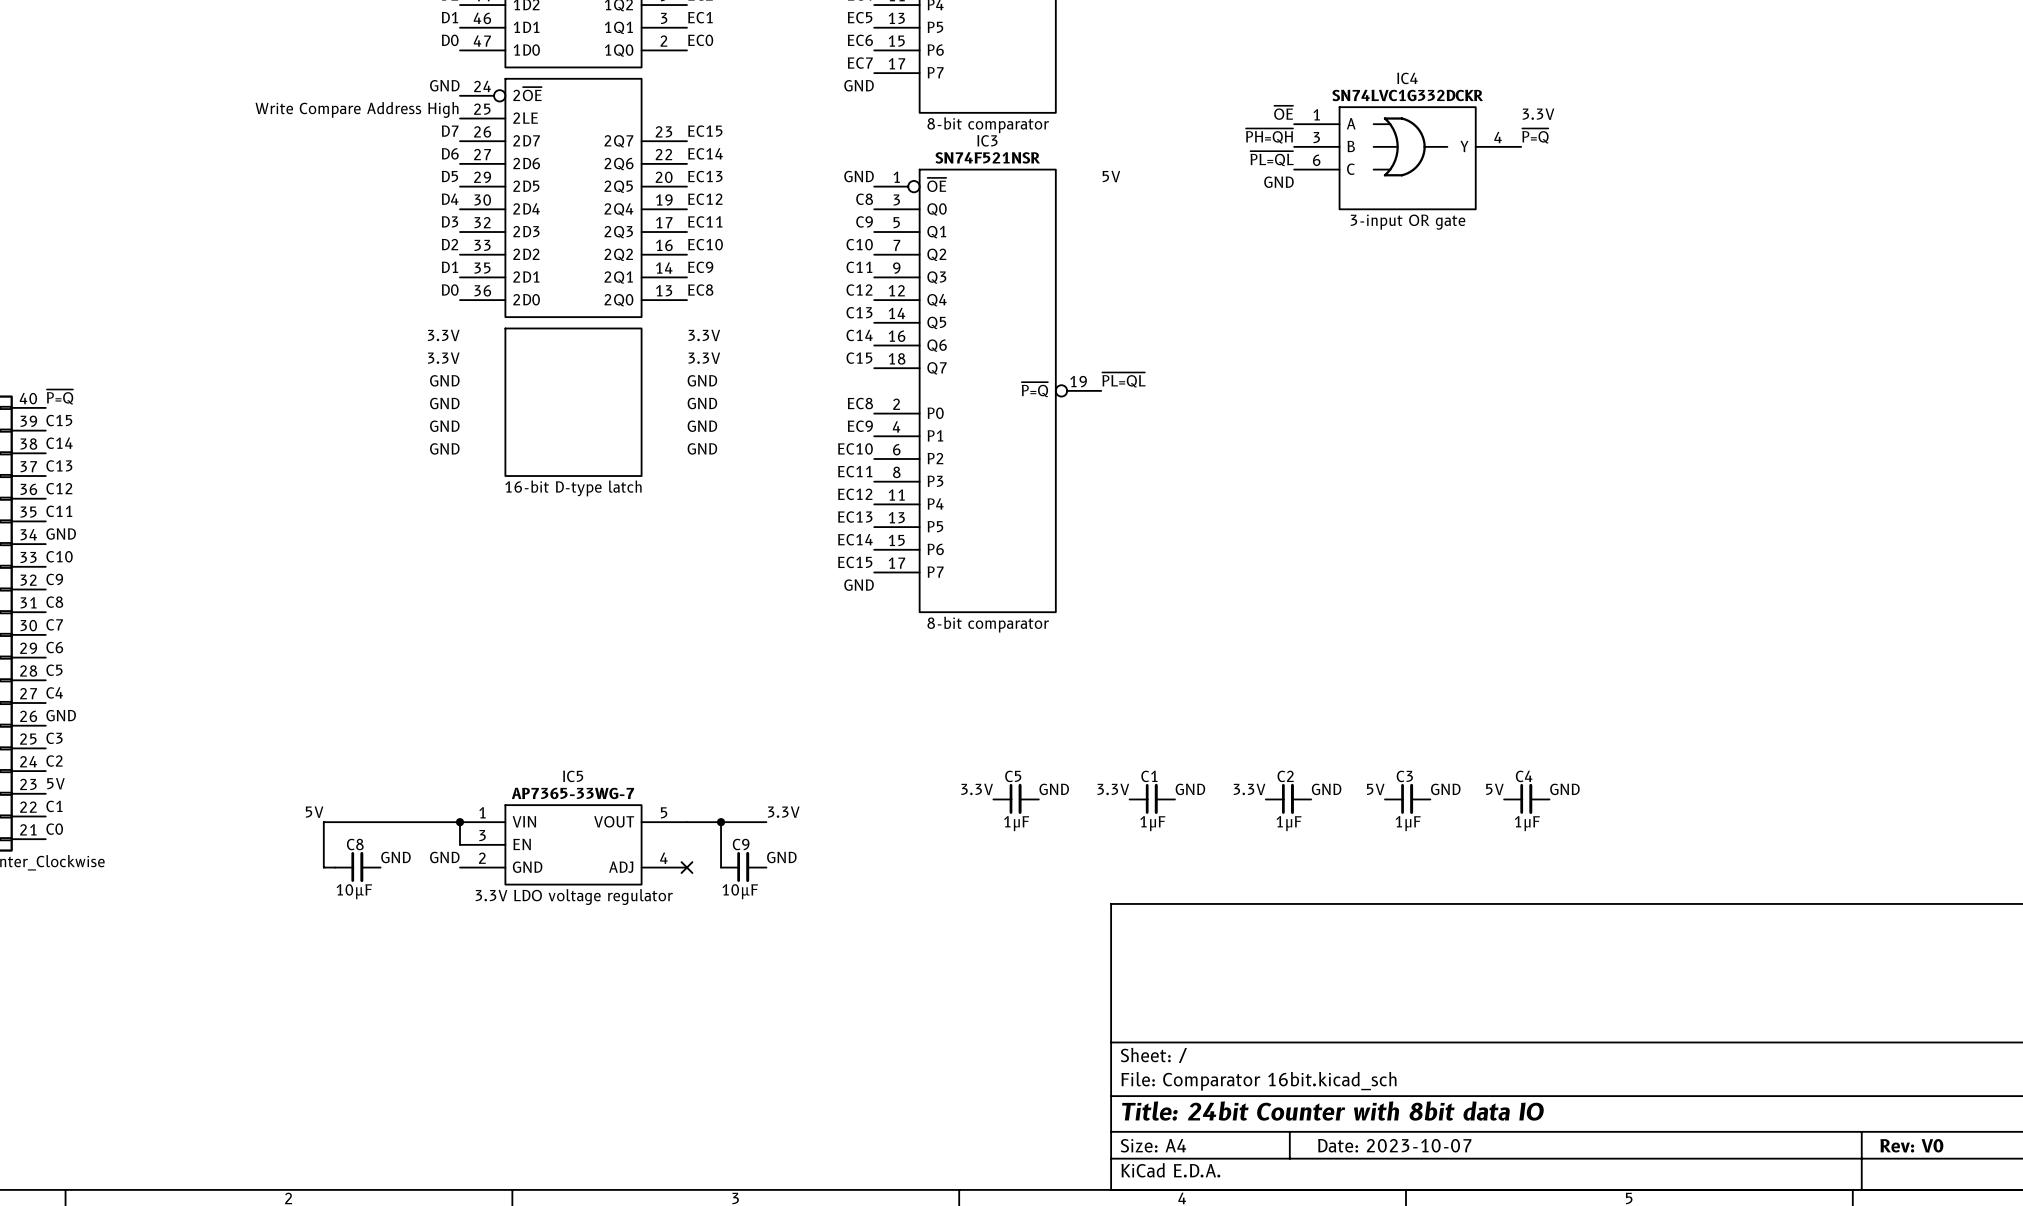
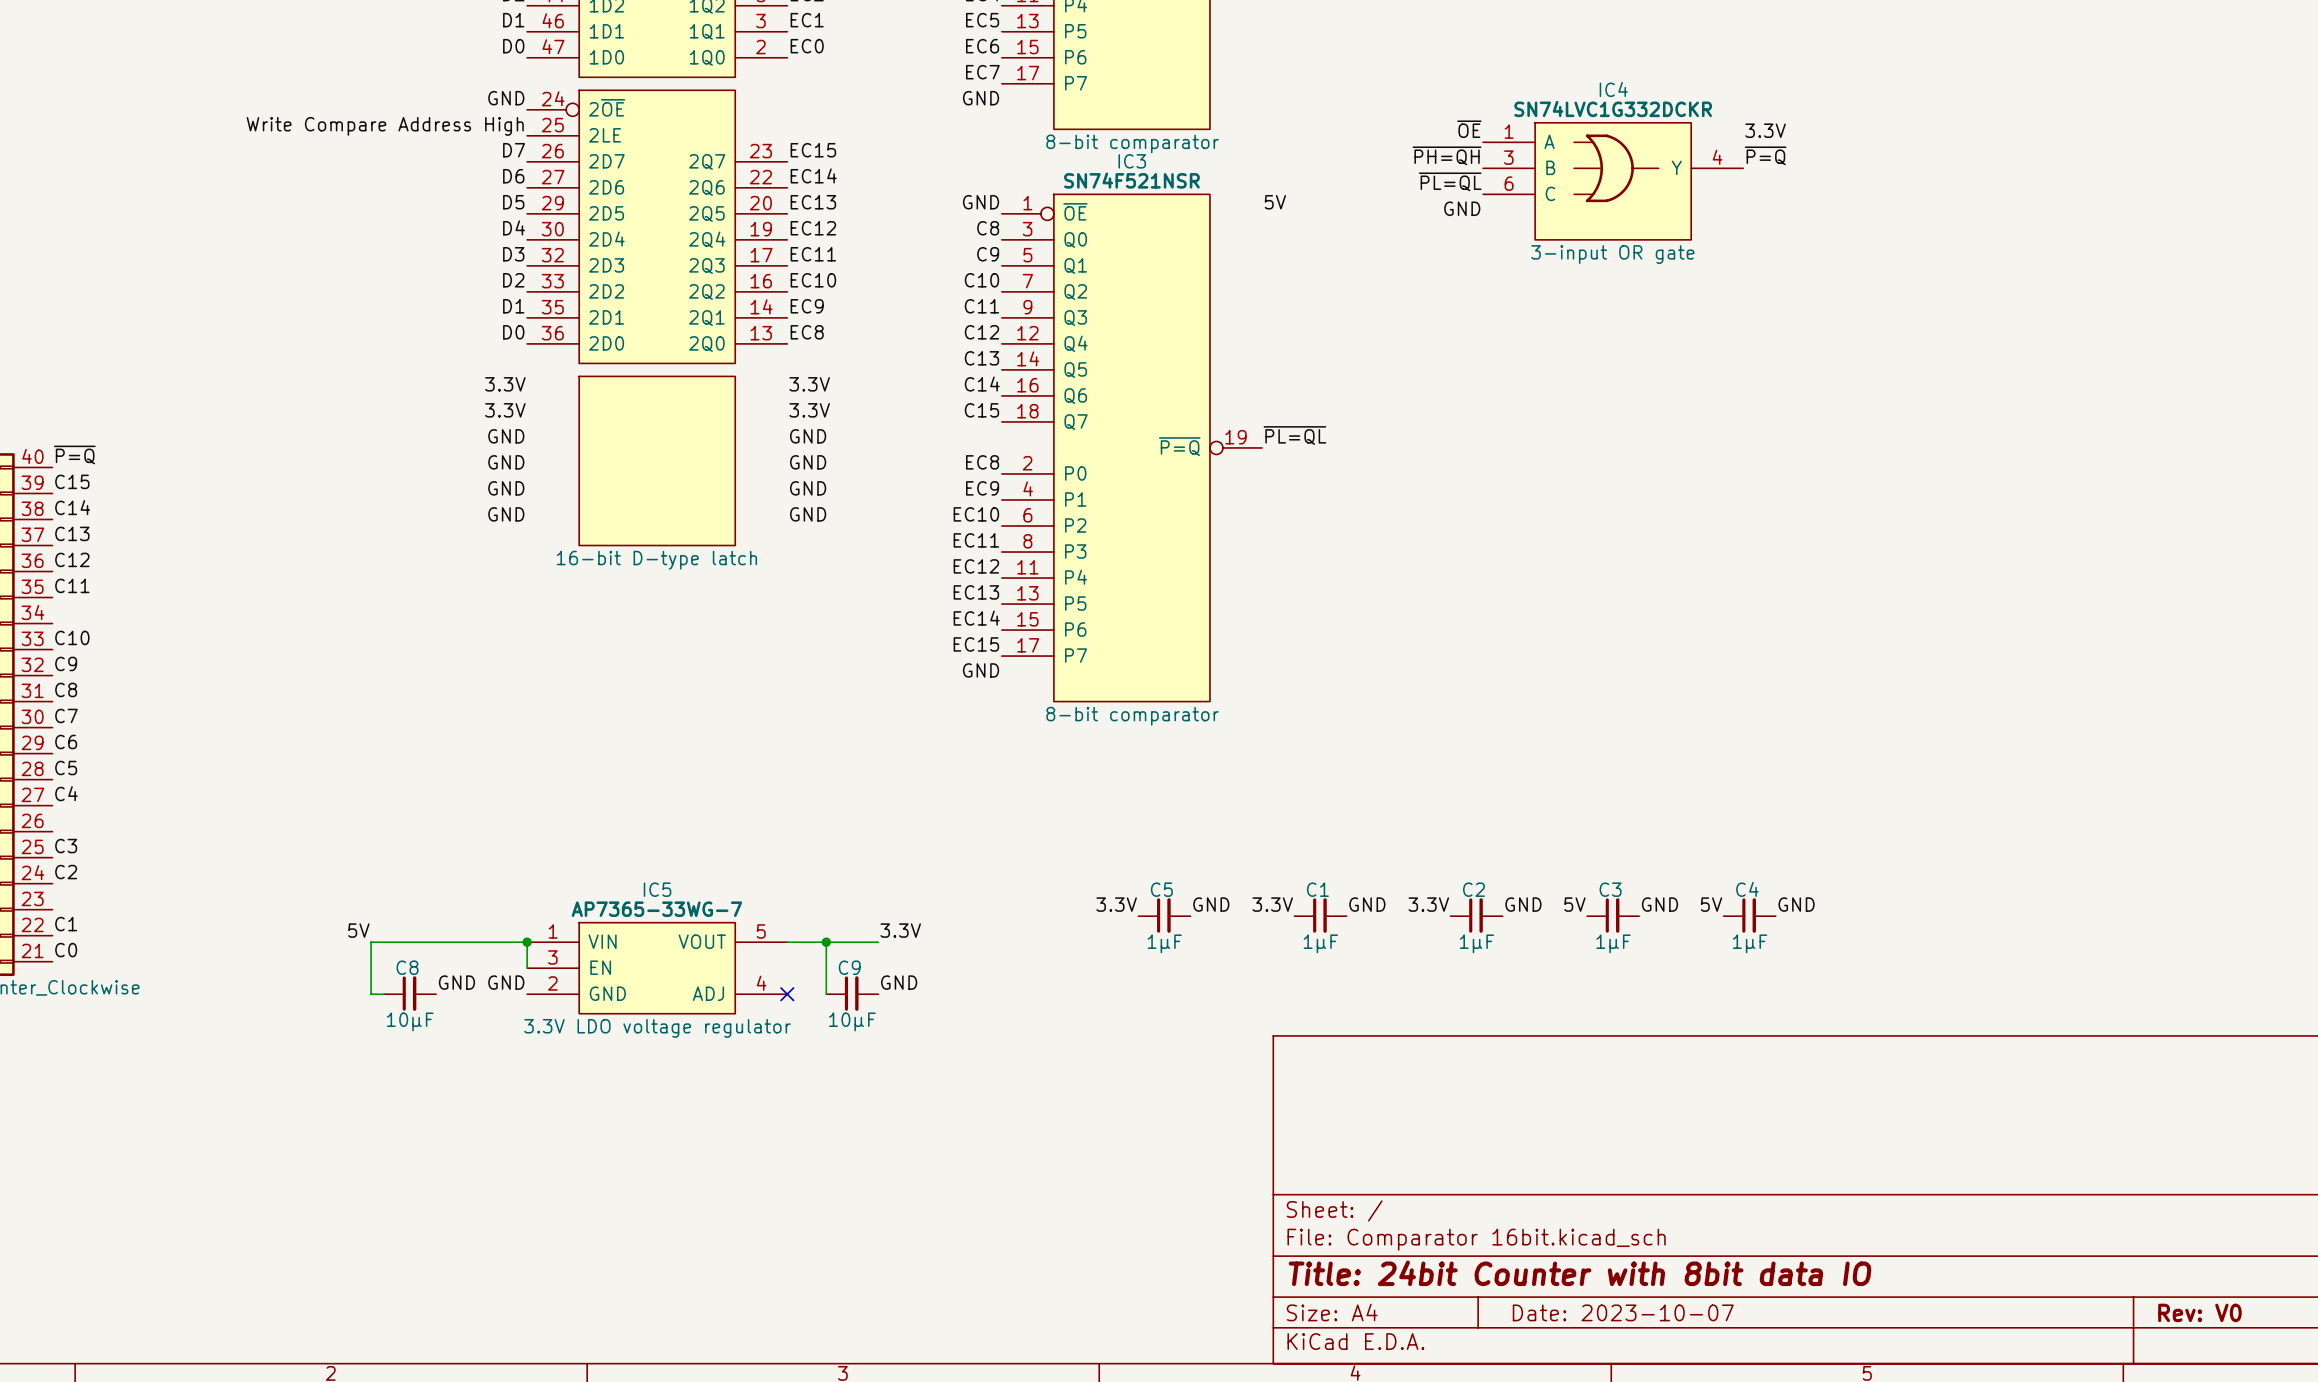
label: GND (61, 534) -> none
label: GND (61, 715) -> none
label: 5V (55, 783) -> none

